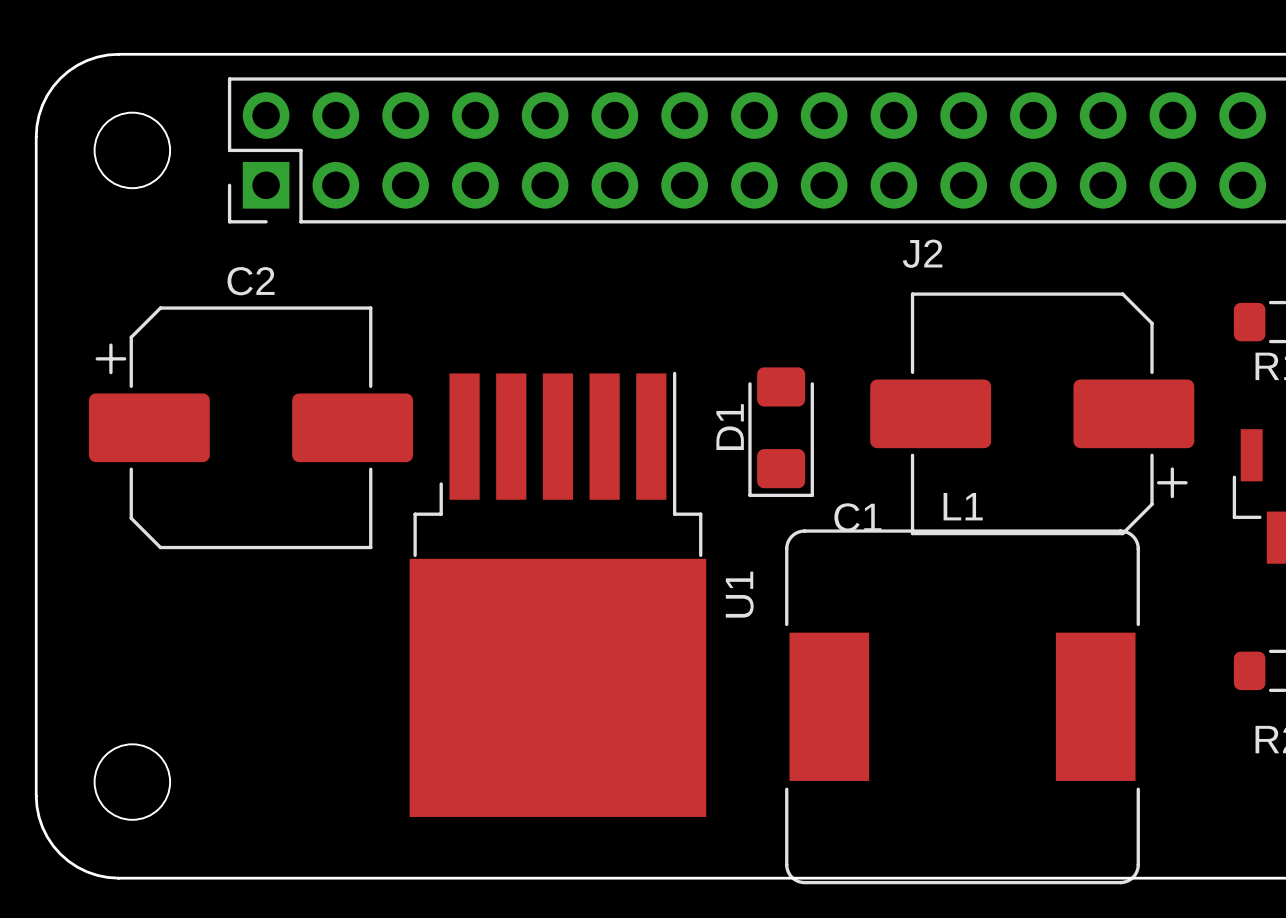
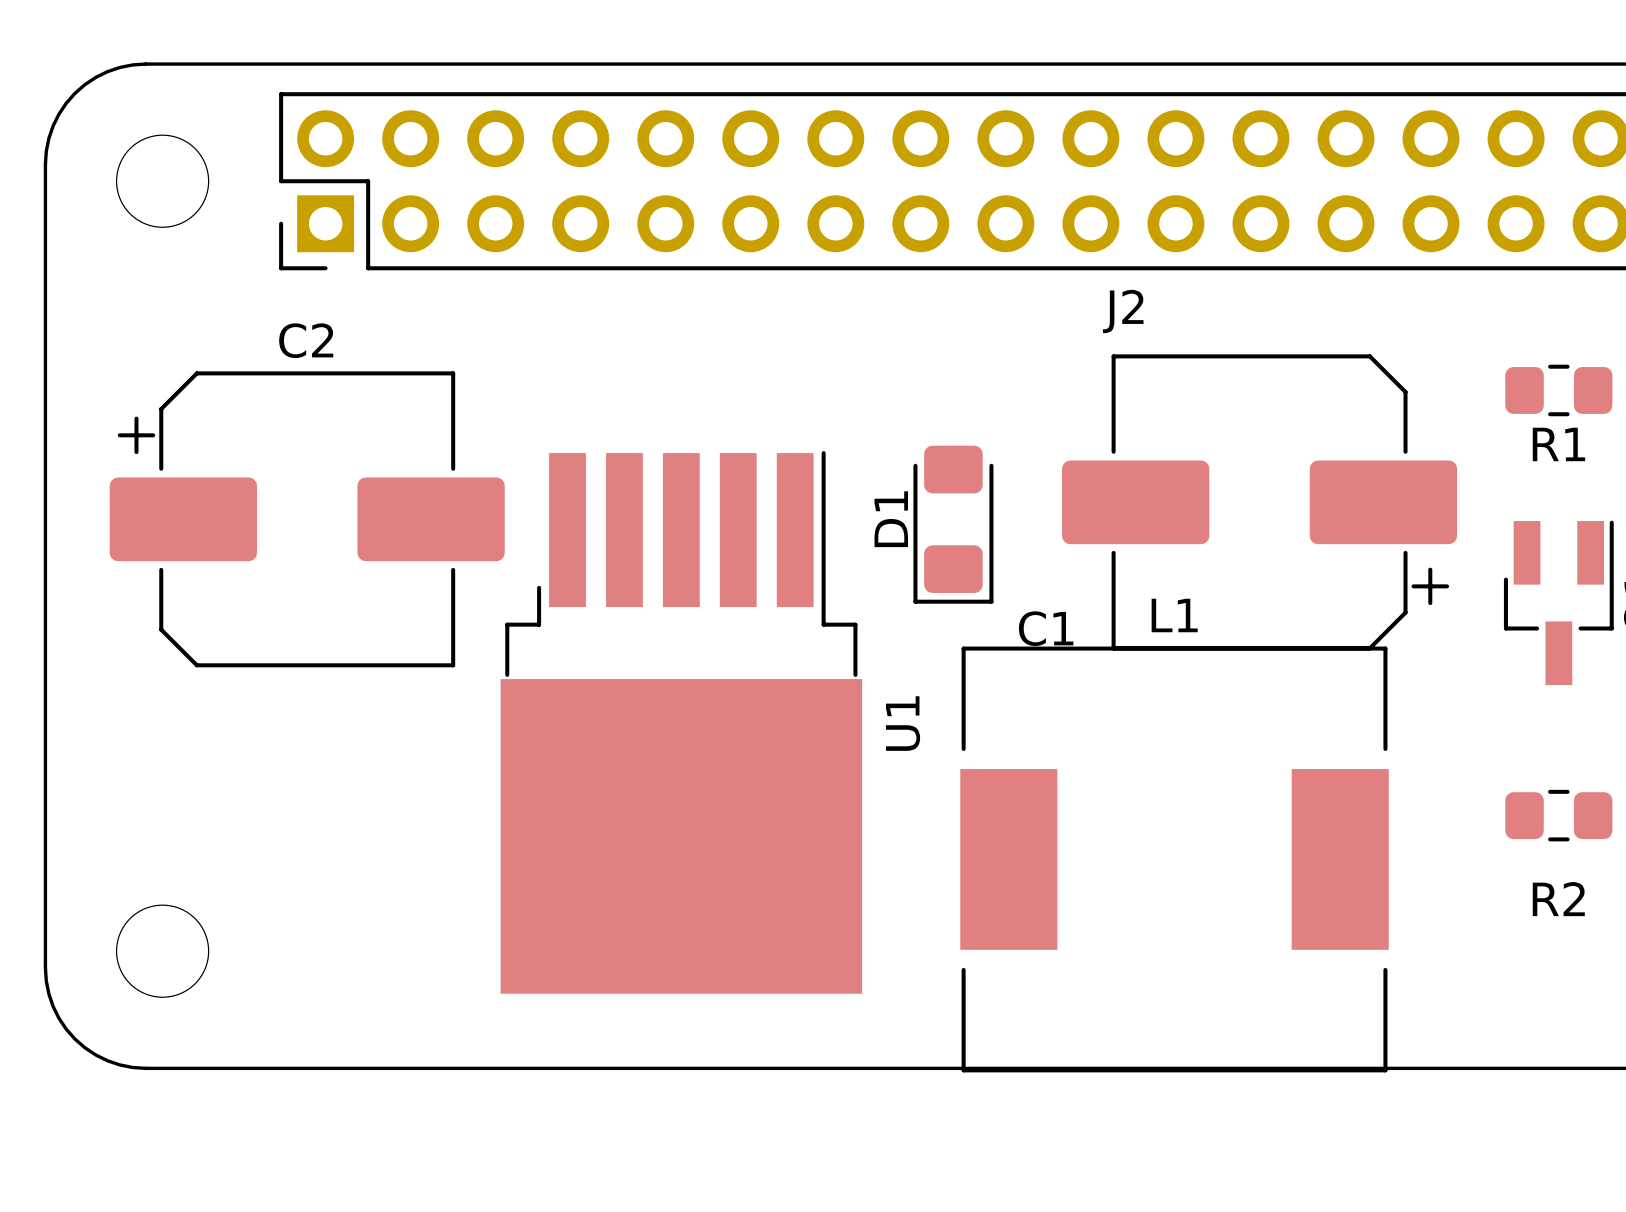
L1 footprint: [785, 529, 1140, 885] -> [960, 646, 1389, 1073]

